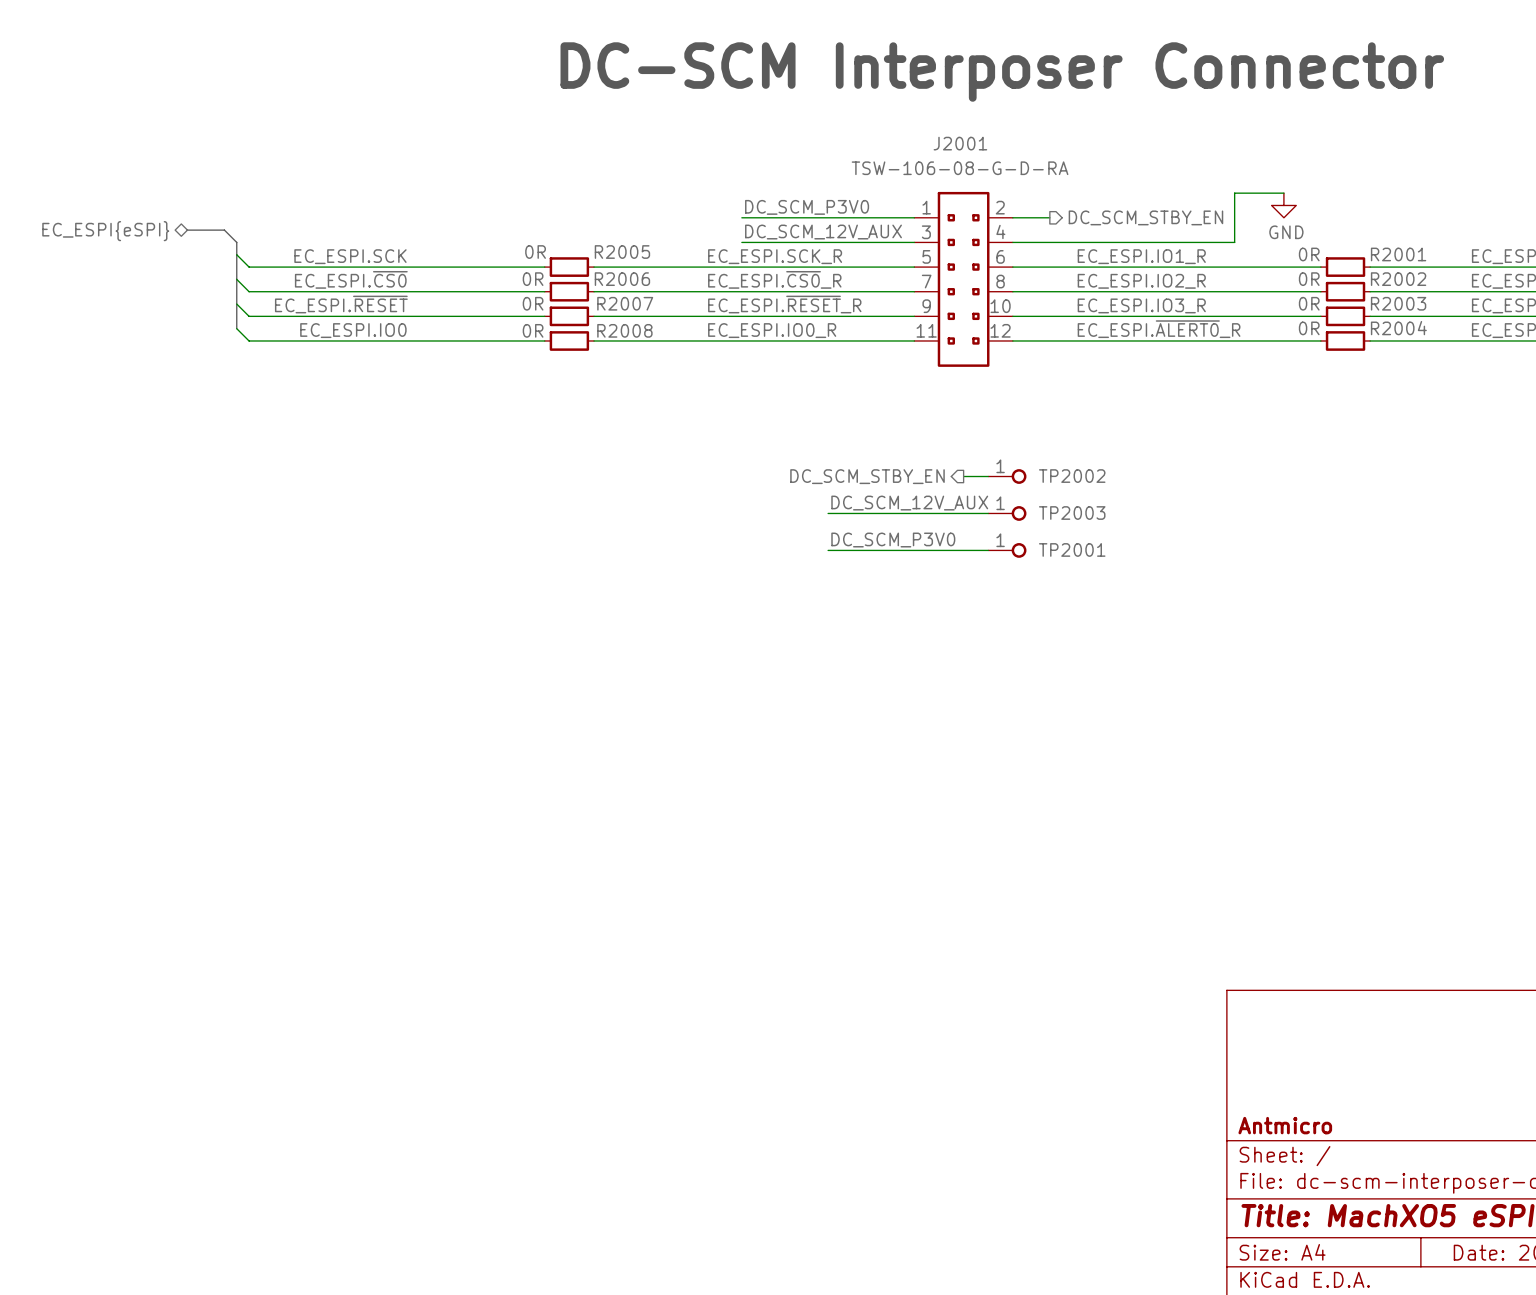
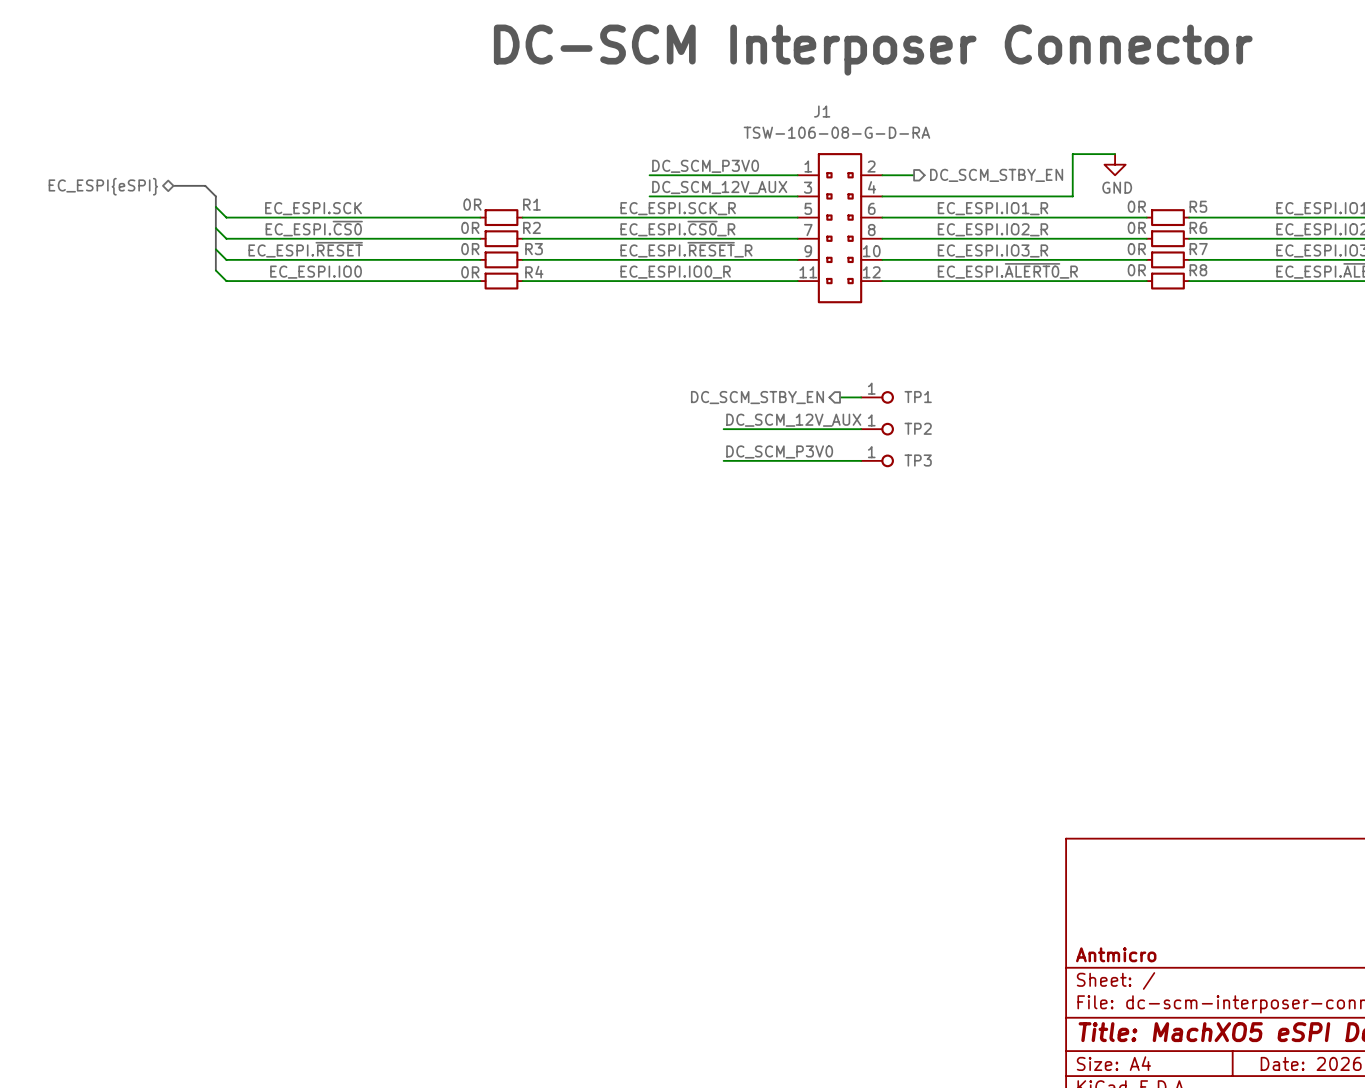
J2001 name: J2001 (960, 143) -> J1 (822, 111)
R2005 name: R2005 (622, 252) -> R1 (531, 204)
R2001 name: R2001 (1398, 254) -> R5 (1198, 206)
R2006 name: R2006 (622, 279) -> R2 (531, 227)
R2002 name: R2002 (1398, 279) -> R6 (1198, 227)
R2007 name: R2007 (625, 303) -> R3 (534, 249)
R2003 name: R2003 (1398, 303) -> R7 (1198, 249)
R2004 name: R2004 (1398, 328) -> R8 (1198, 270)
R2008 name: R2008 (624, 330) -> R4 (534, 272)
TP2002 name: TP2002 (1072, 476) -> TP1 (918, 397)
TP2003 name: TP2003 (1072, 513) -> TP2 (918, 428)
TP2001 name: TP2001 (1072, 549) -> TP3 (918, 460)

